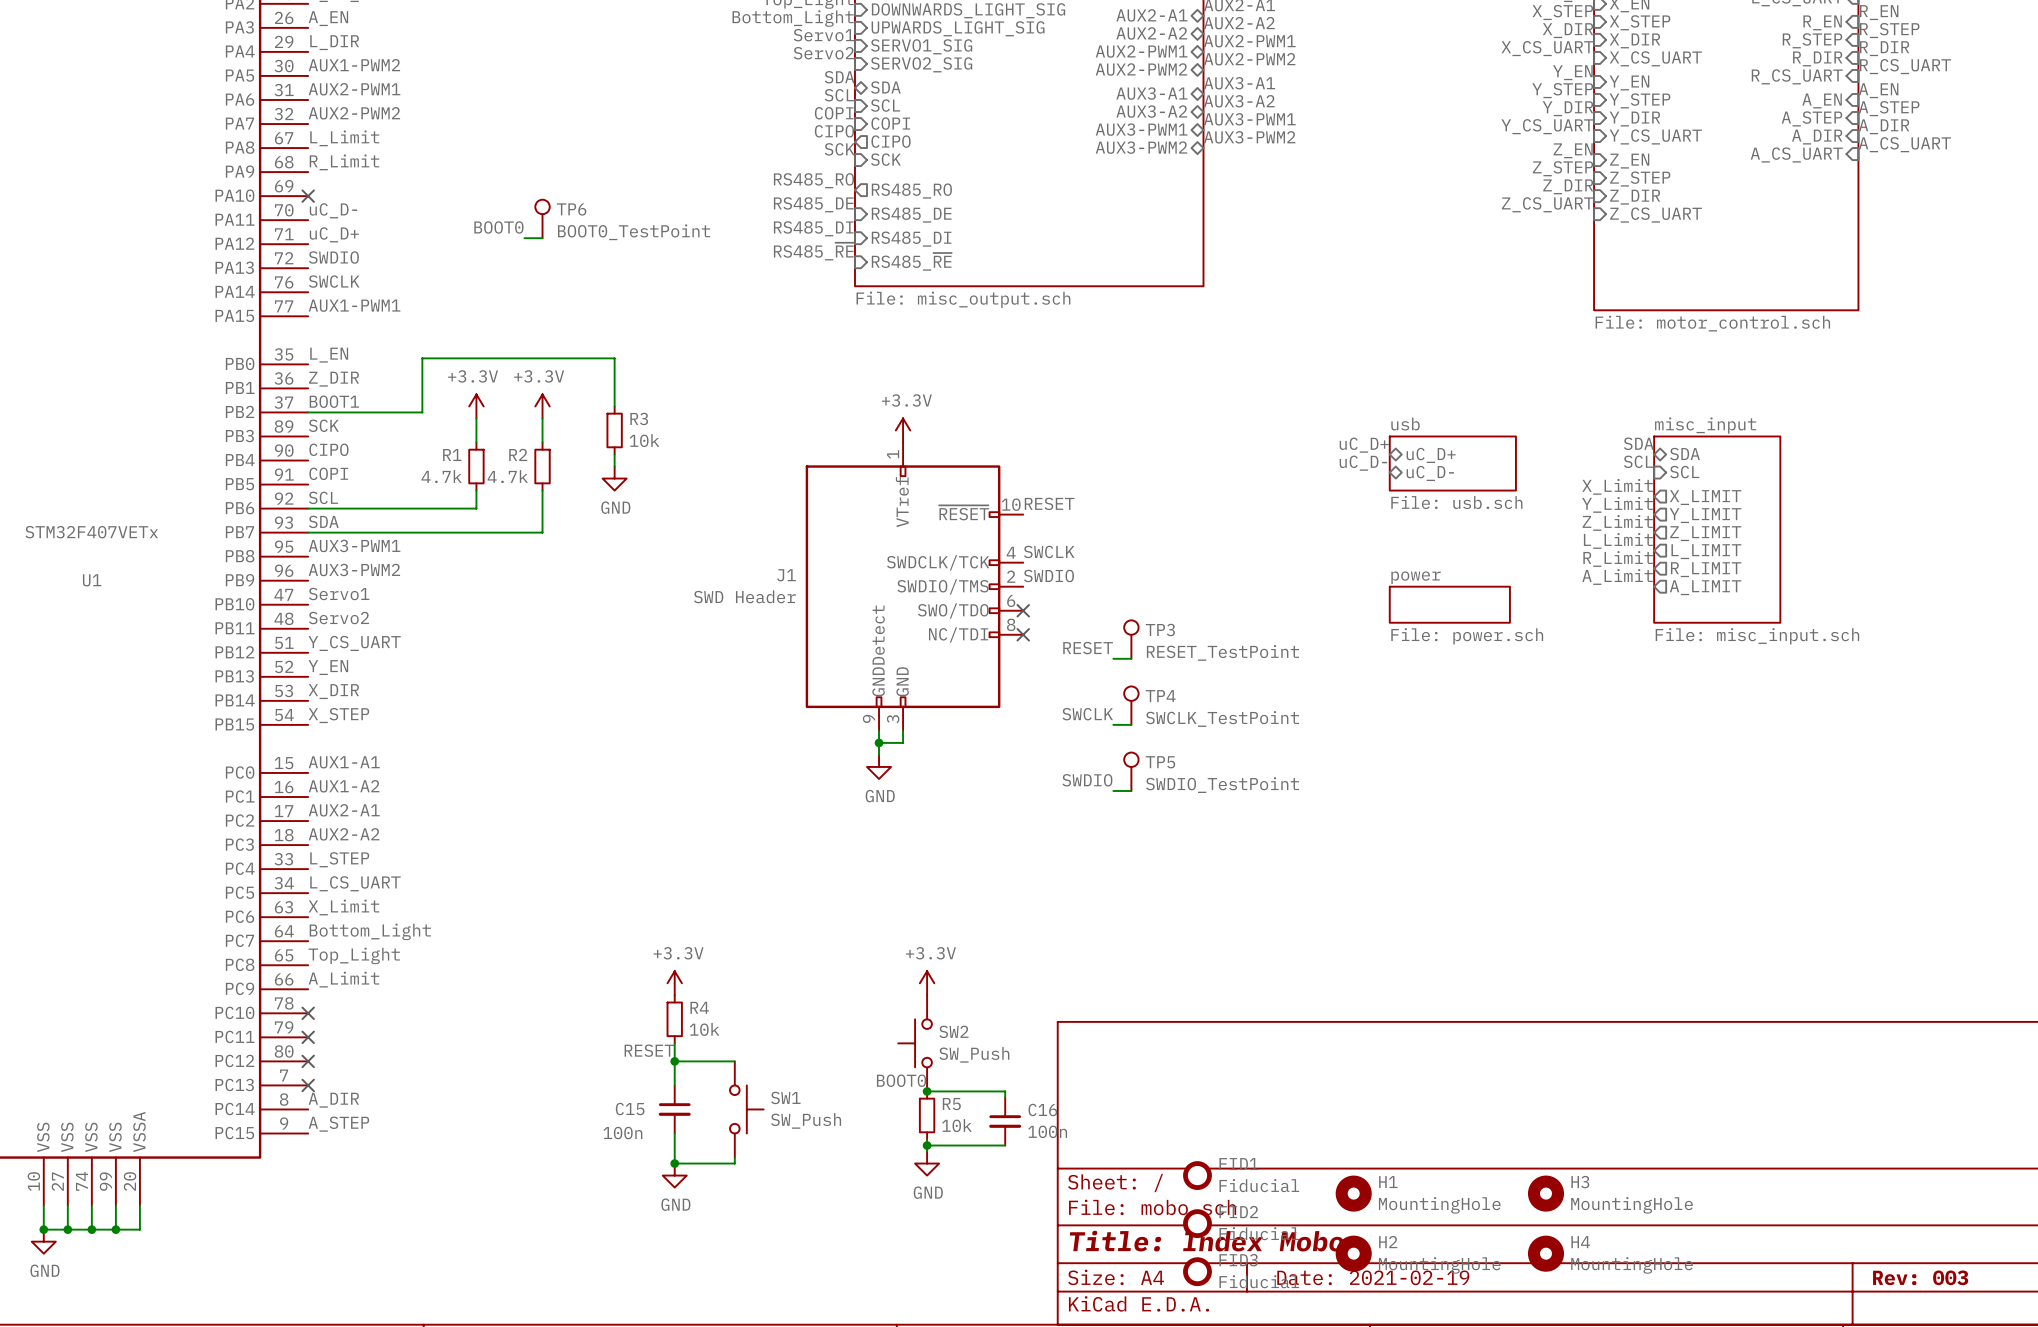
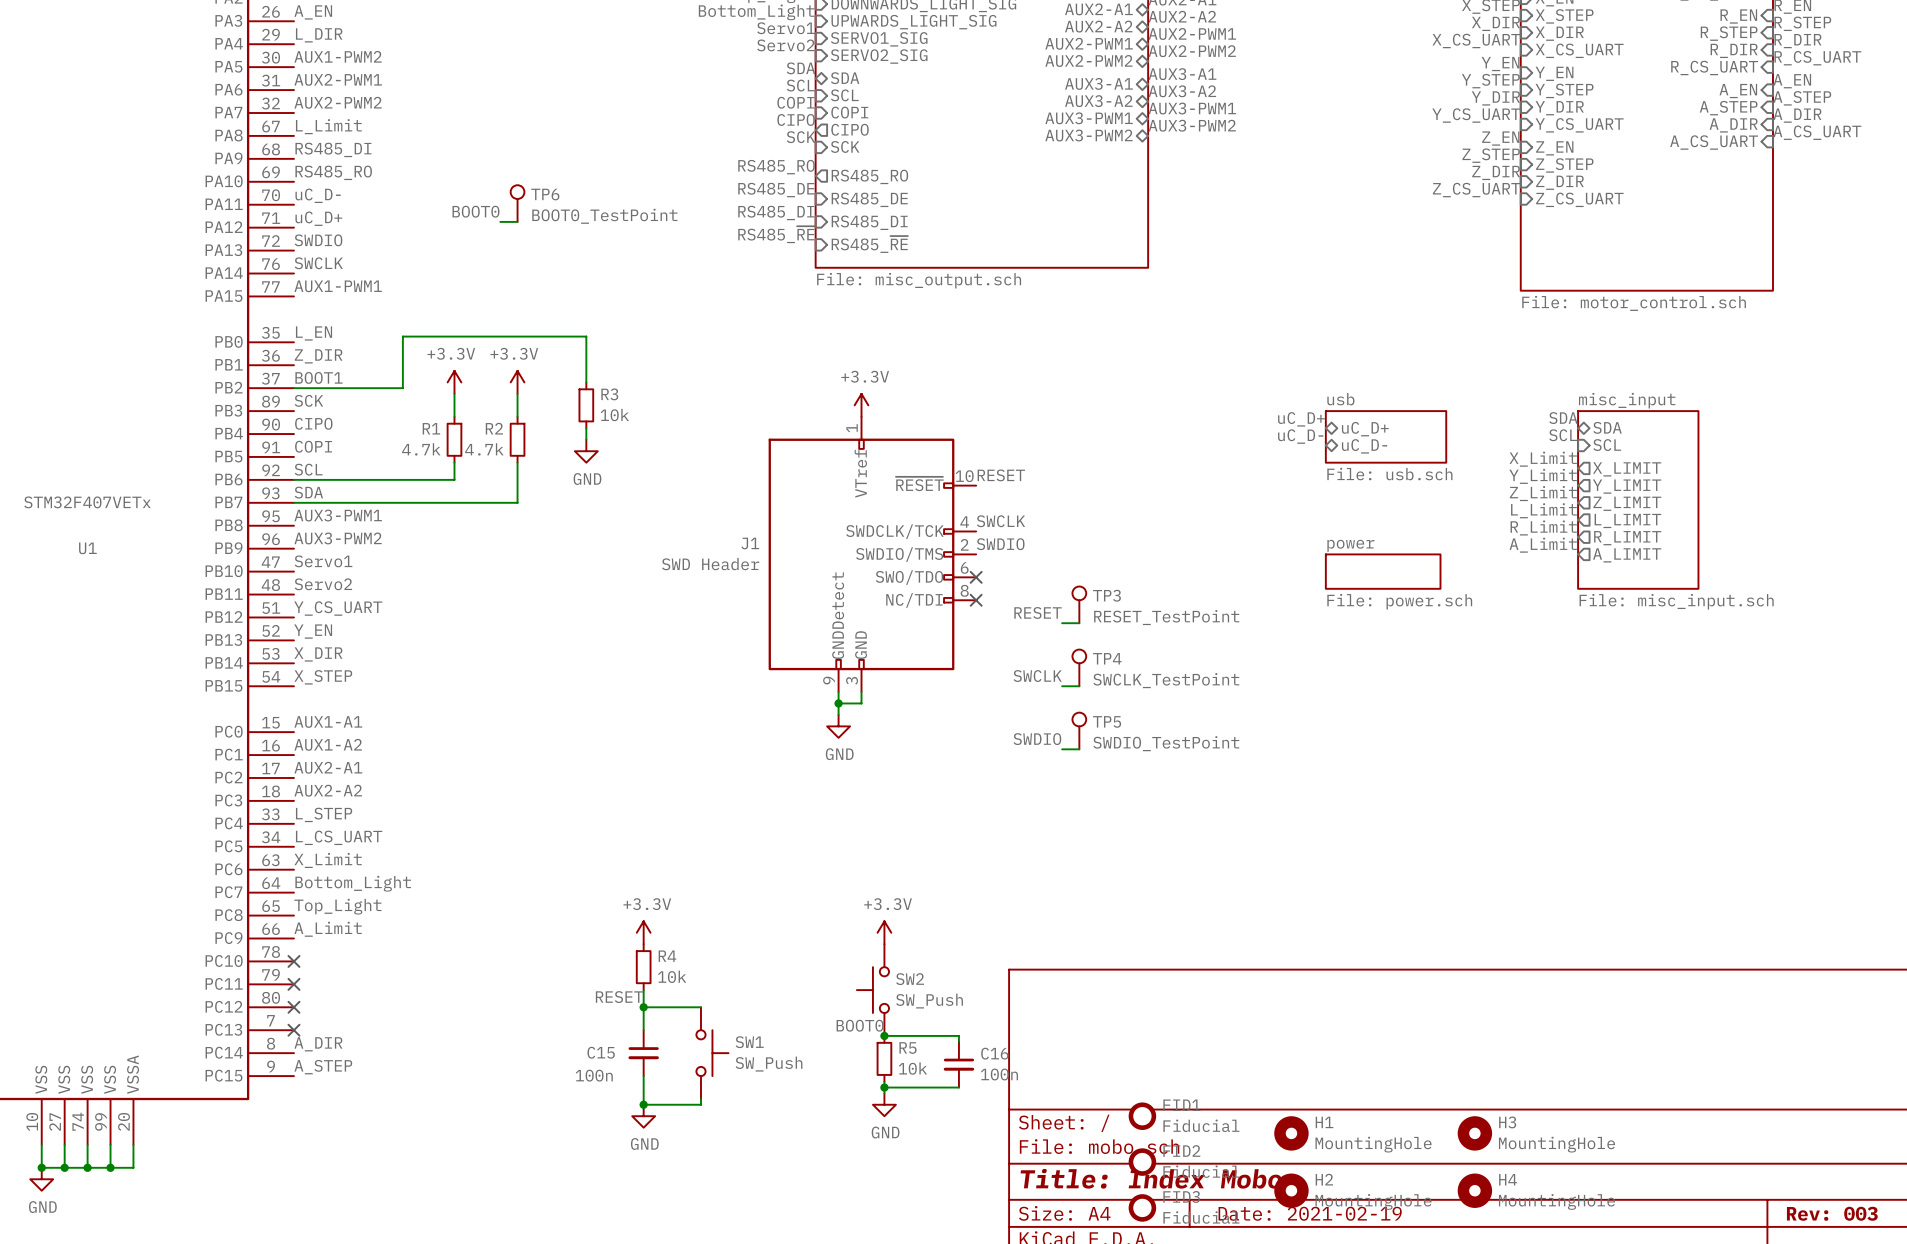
label: R_Limit (344, 162) -> RS485_DI (333, 149)
label: none -> RS485_RO (333, 172)
no-connect mark: (308, 196) -> none

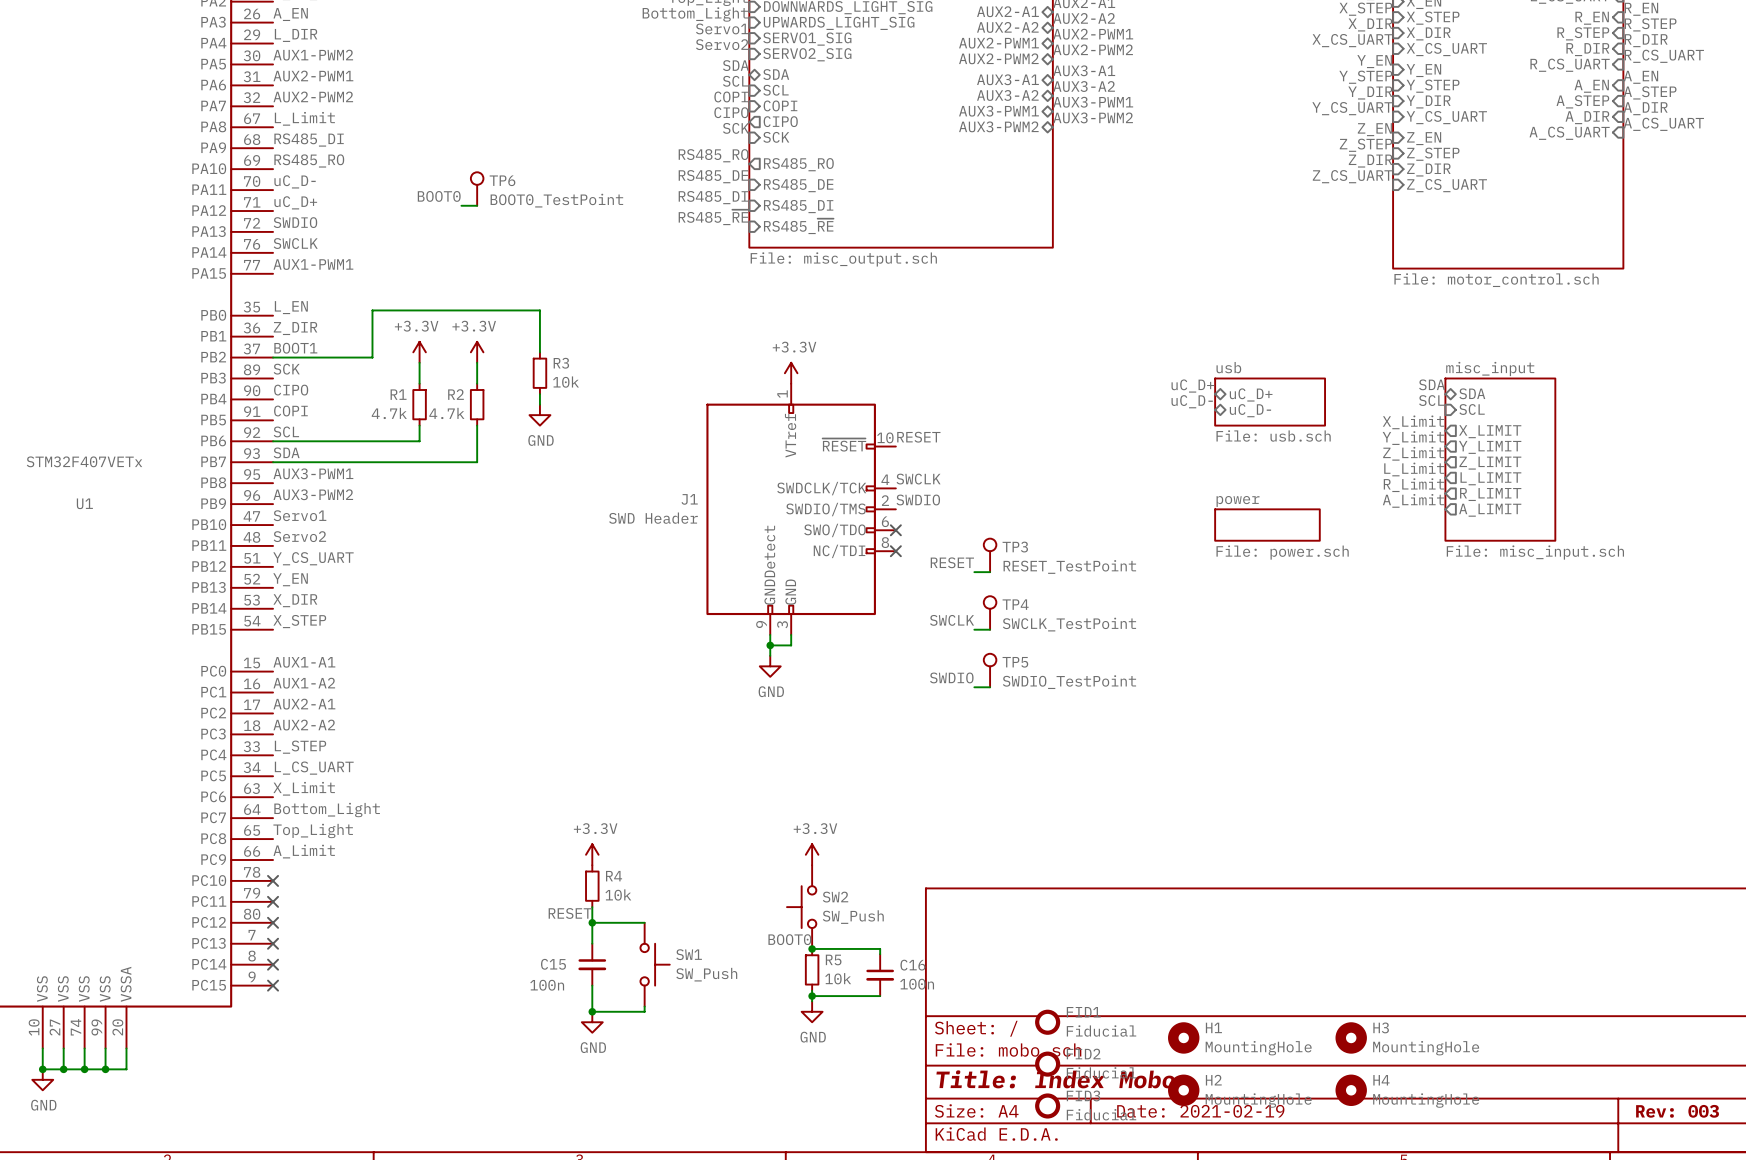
label: A_DIR (318, 1044) -> none
no-connect mark: none -> (273, 964)
label: A_STEP (323, 1067) -> none
no-connect mark: none -> (273, 985)

